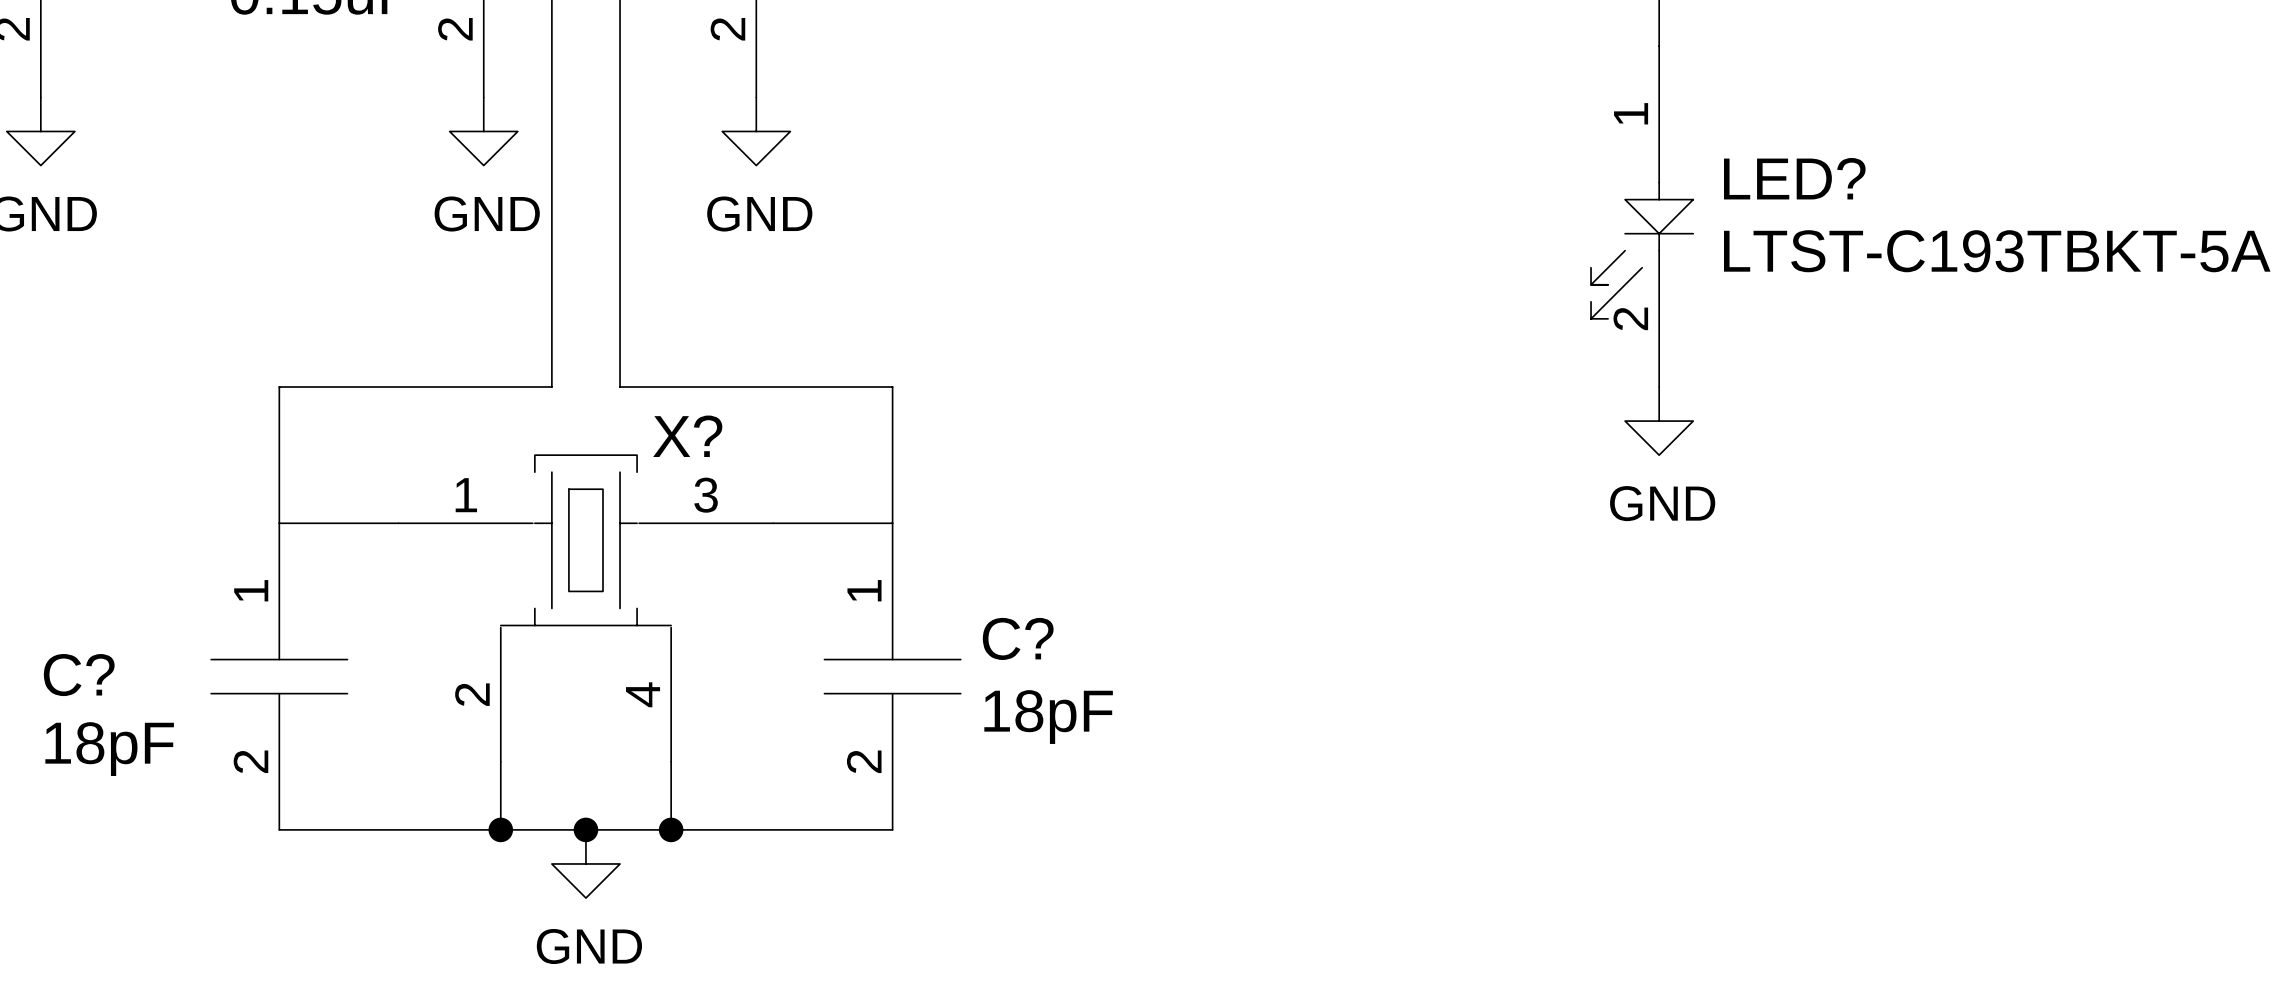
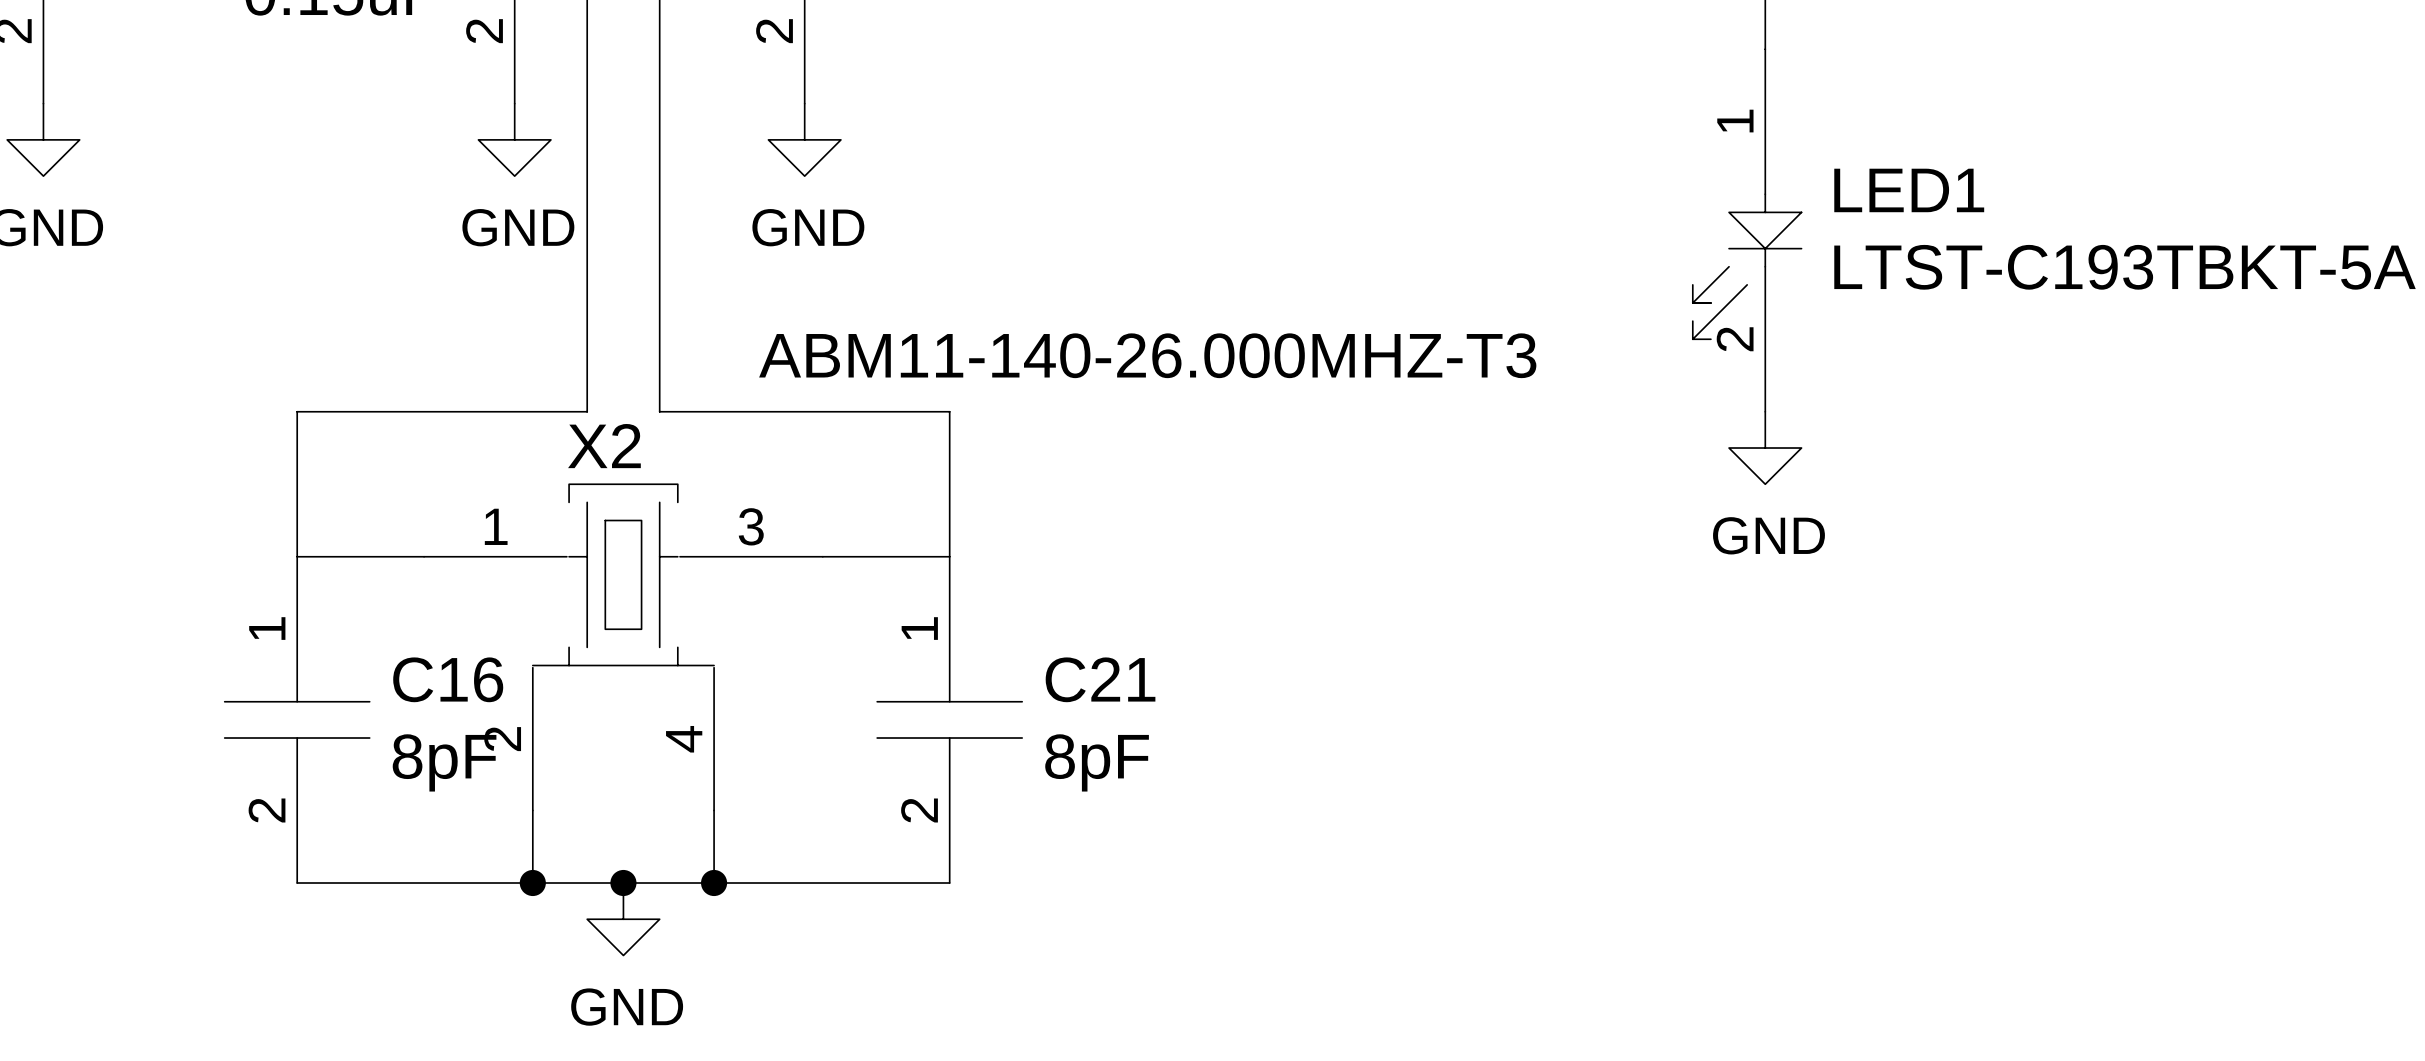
LED? name: LED? (1794, 178) -> LED1 (1909, 190)
X? value: none -> ABM11-140-26.000MHZ-T3 (1147, 355)
X? name: X? (687, 436) -> X2 (604, 446)
C? name: C? (1018, 638) -> C21 (1100, 679)
C? name: C? (79, 675) -> C16 (448, 679)
C? text: 18pF (1048, 717) -> 8pF (1097, 762)
C? text: 18pF (109, 749) -> 8pF (444, 762)

